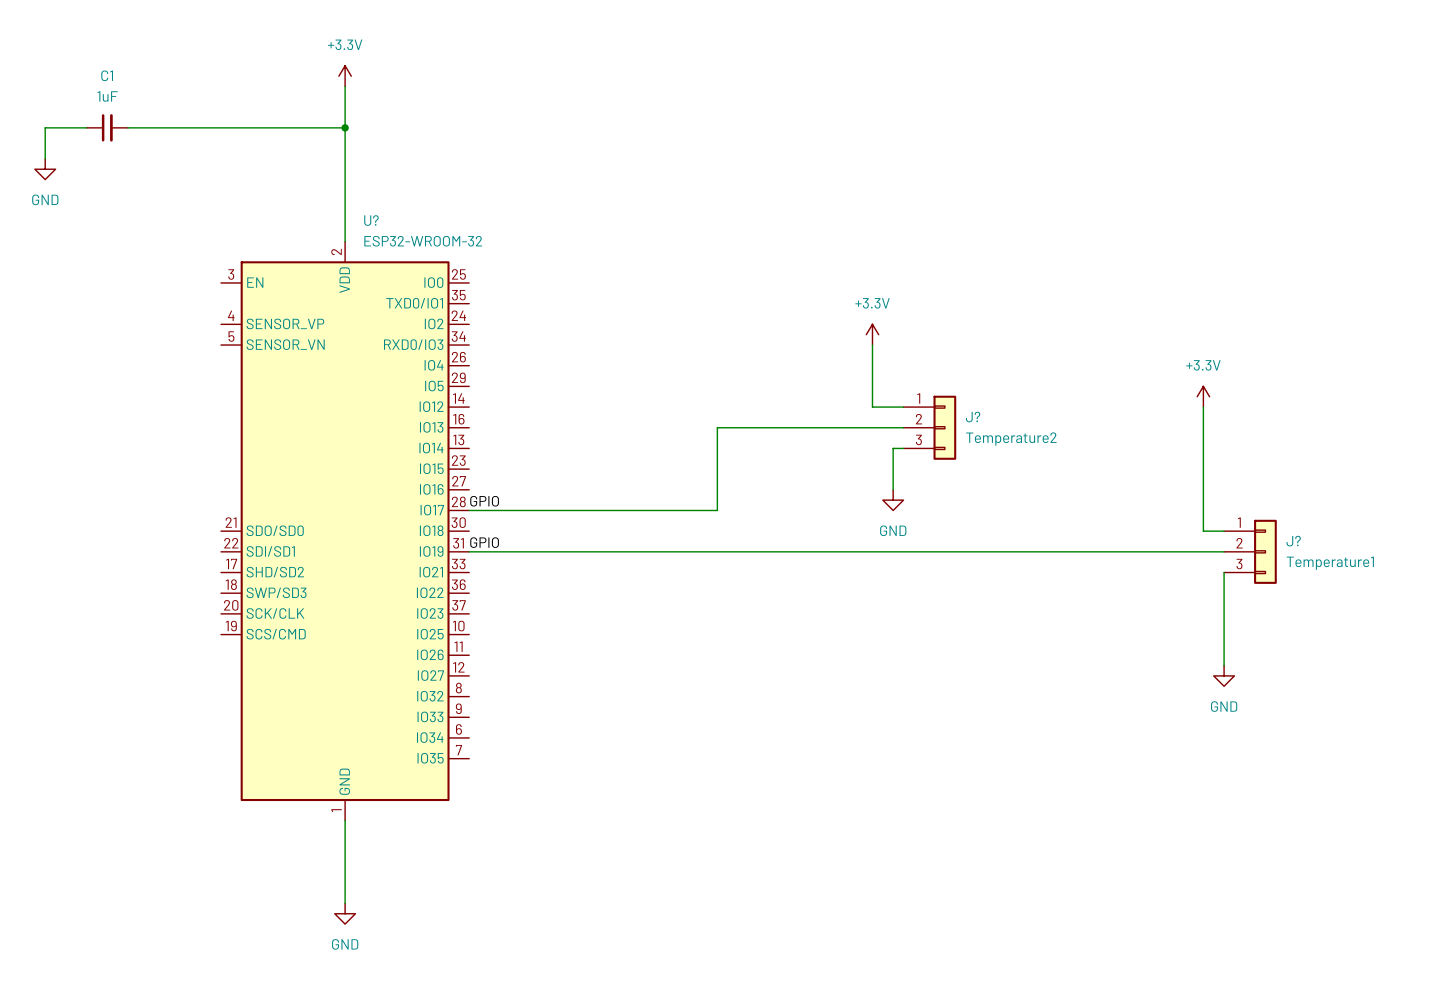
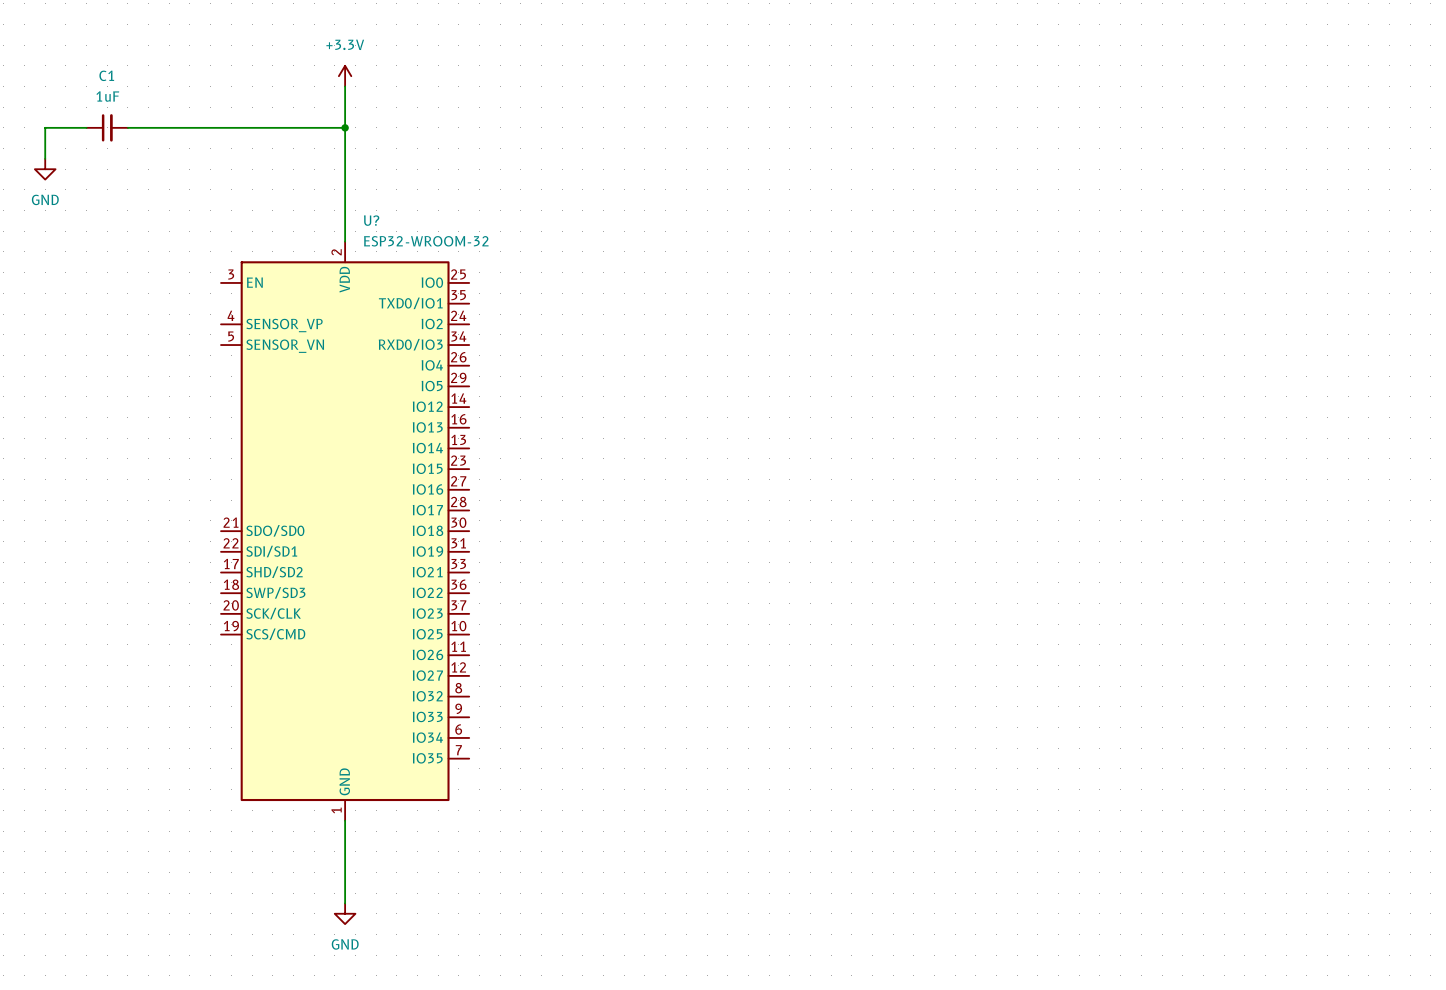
power symbol: +3.3V (872, 334) -> none
wire: (872, 345) (872, 407) (903, 407) -> none
power symbol: +3.3V (1203, 396) -> none
wire: (1203, 407) (1203, 531) (1224, 531) -> none
wire: (903, 427) (717, 427) (717, 510) (469, 510) -> none
J?: Temperature2 (929, 427) -> none
wire: (903, 448) (893, 448) (893, 489) -> none
power symbol: GND (893, 500) -> none
label: GPIO (484, 501) -> none
label: GPIO (484, 542) -> none
wire: (469, 551) (1224, 551) -> none
J?: Temperature1 (1250, 551) -> none
wire: (1224, 572) (1224, 665) -> none
power symbol: GND (1224, 675) -> none

